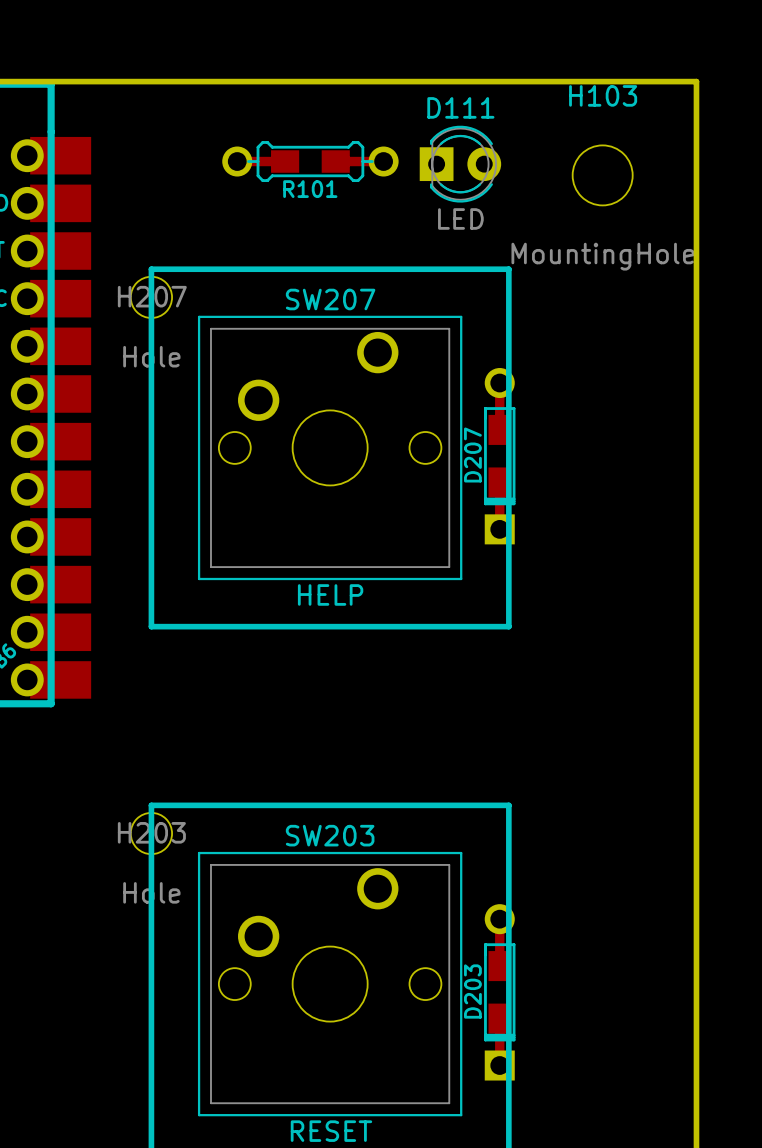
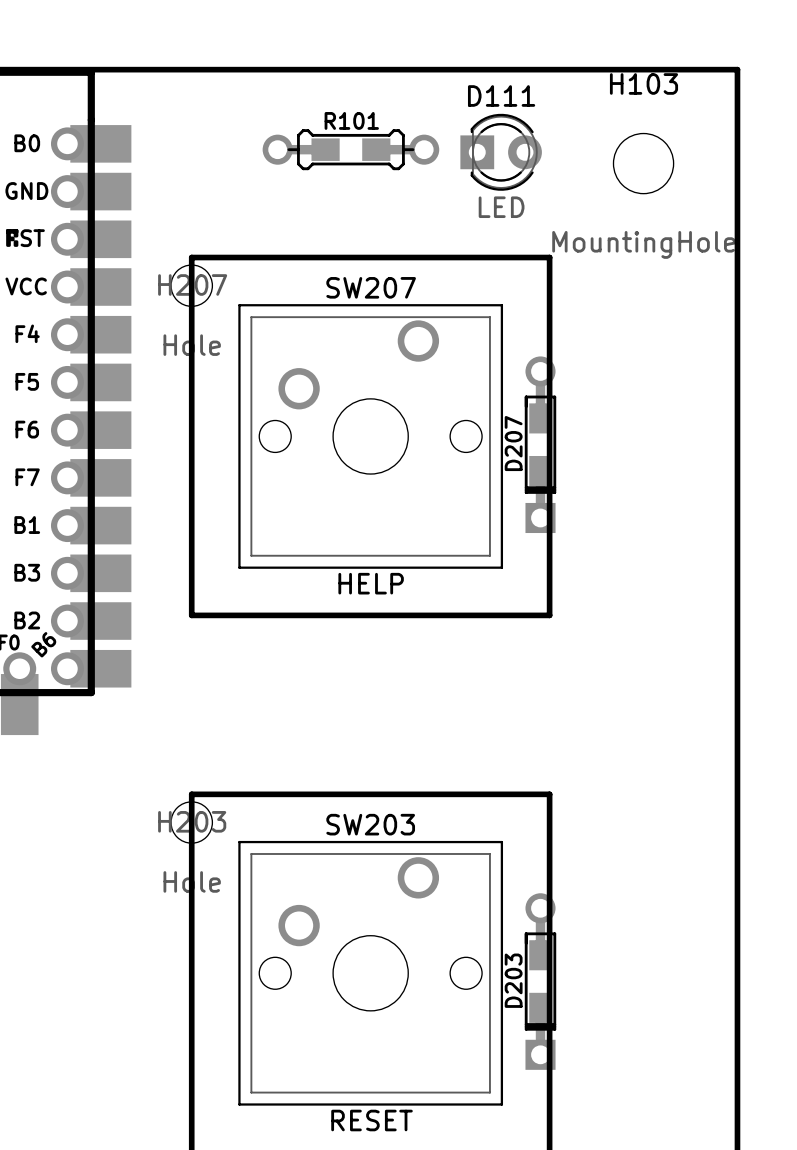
R101 name position: R101 (310, 189) -> R101 (351, 120)

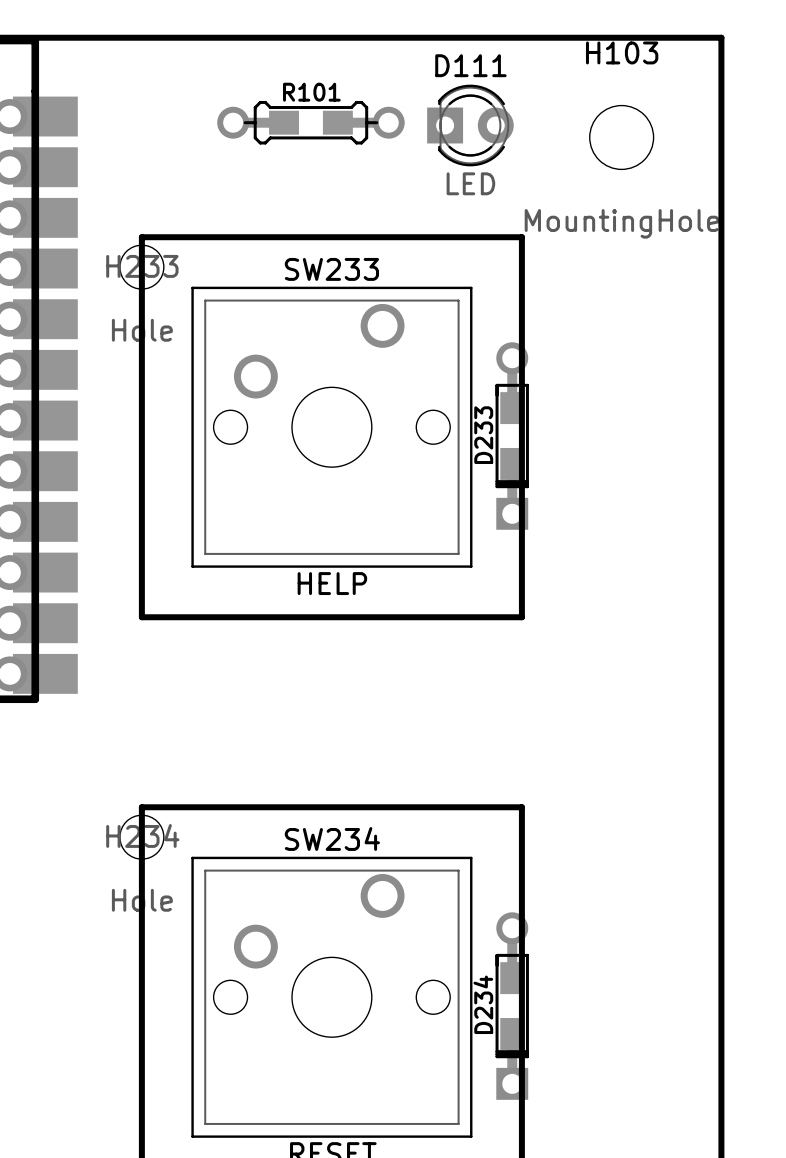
H207 name: H207 (192, 284) -> H233 (142, 266)
SW207 name: SW207 (371, 287) -> SW233 (331, 269)
D207 name: D207 (513, 443) -> D233 (483, 435)
H203 name: H203 (192, 821) -> H234 (142, 835)
SW203 name: SW203 (370, 824) -> SW234 (332, 838)
D203 name: D203 (513, 980) -> D234 (483, 1004)

